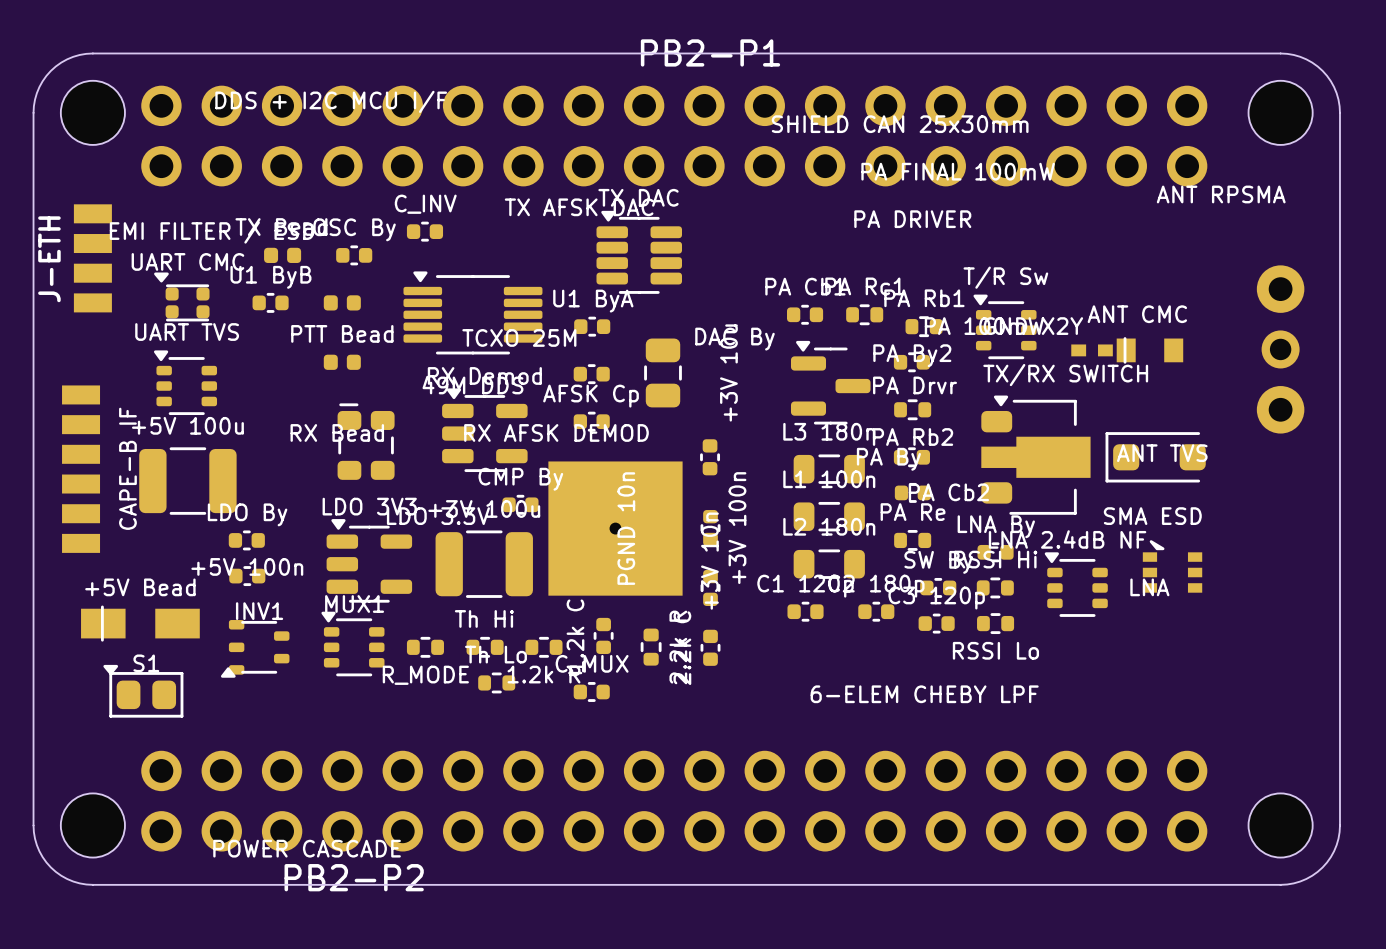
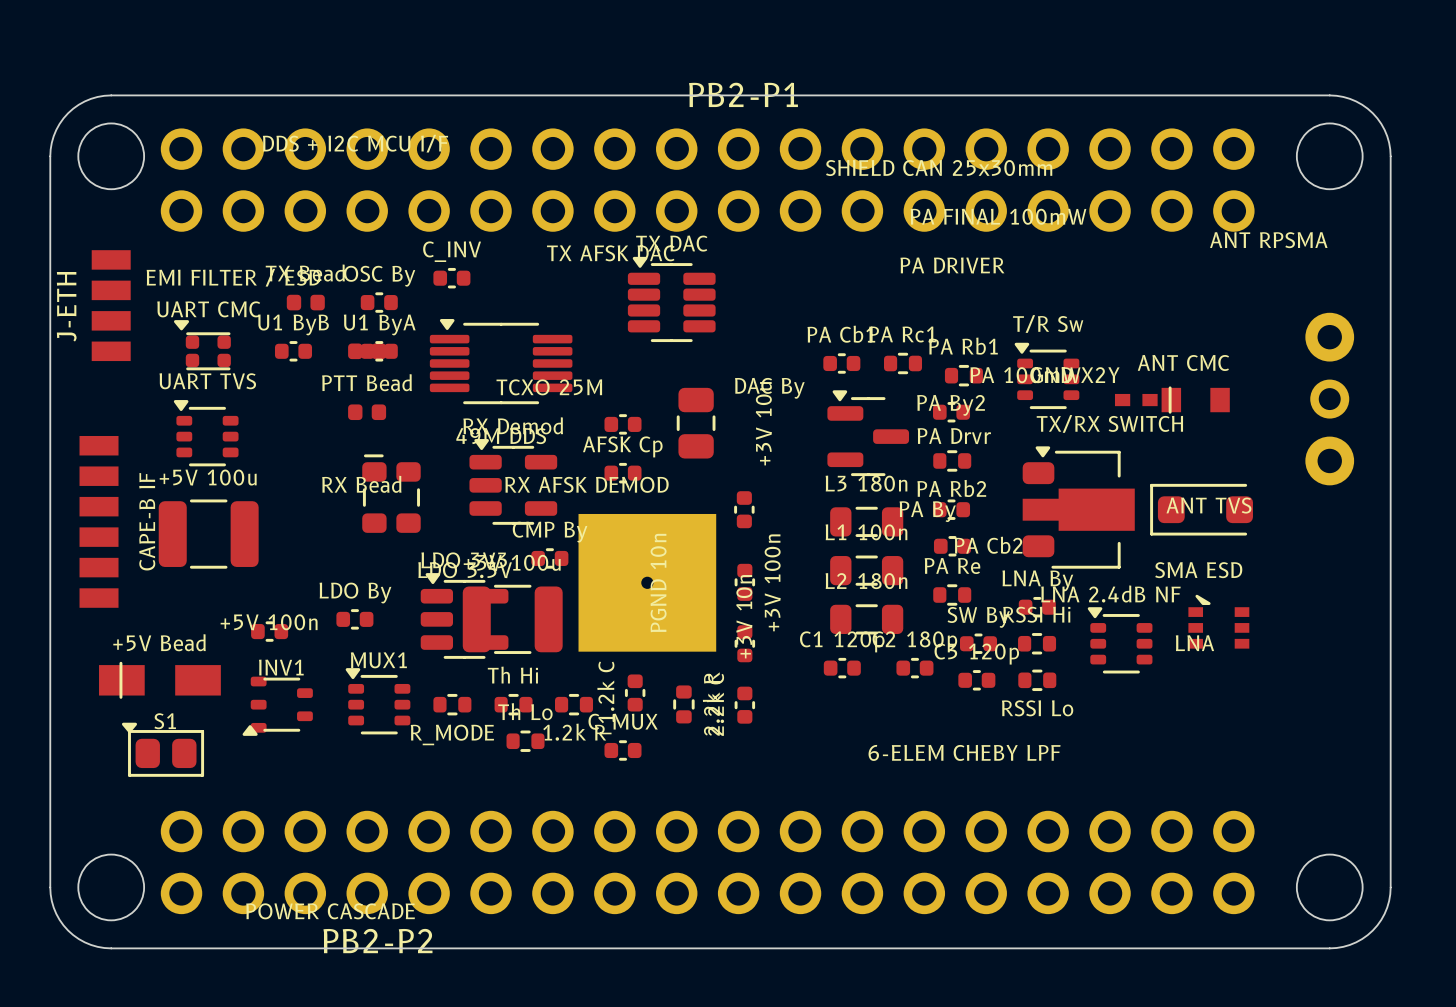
U1 ByA position: (592, 326) -> (379, 351)
LDO By position: (246, 540) -> (354, 619)
LDO 3V3 position: (369, 560) -> (464, 615)

